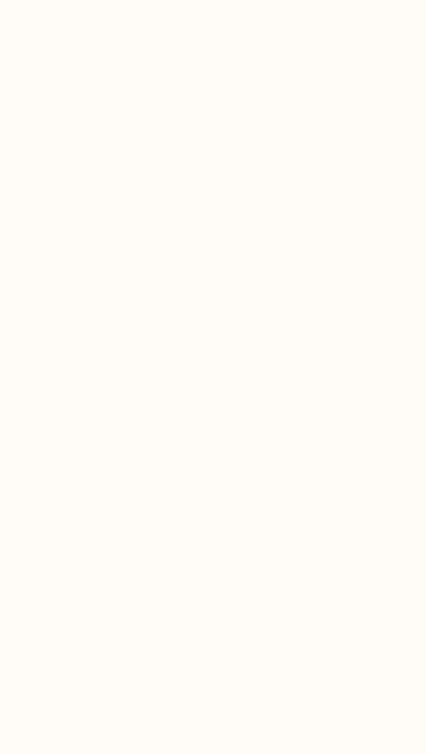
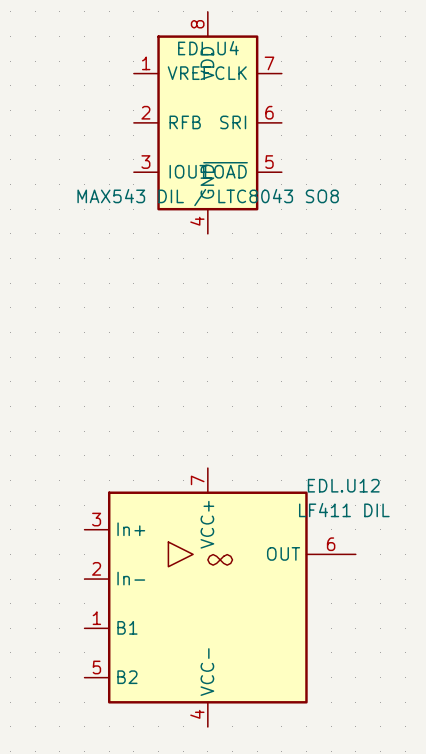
EDL.U4: none -> MAX543 DIL / LTC8043 SO8 (207, 122)
EDL.U12: none -> LF411 DIL (220, 597)

